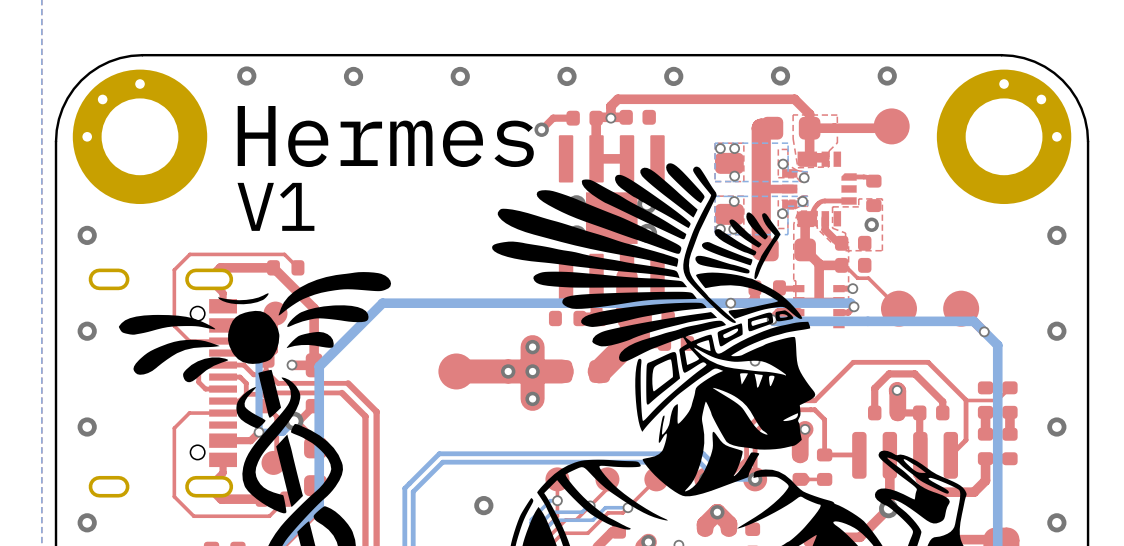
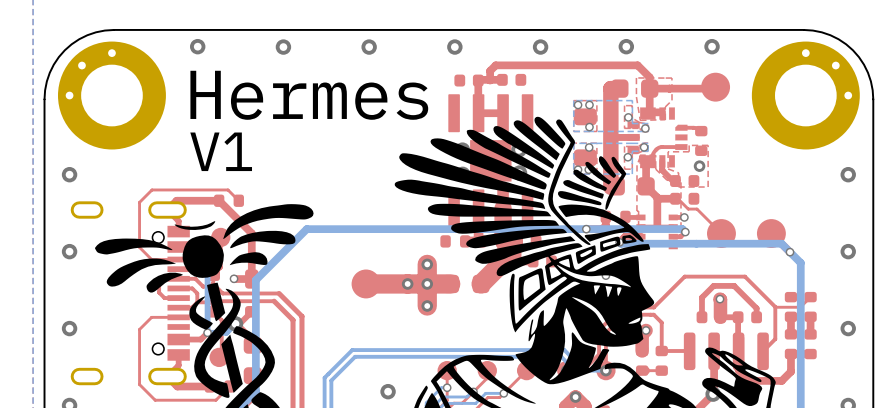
top track: (573, 118) (553, 118) (541, 129) -> none
via: (610, 118) -> none
via: (541, 129) -> none

